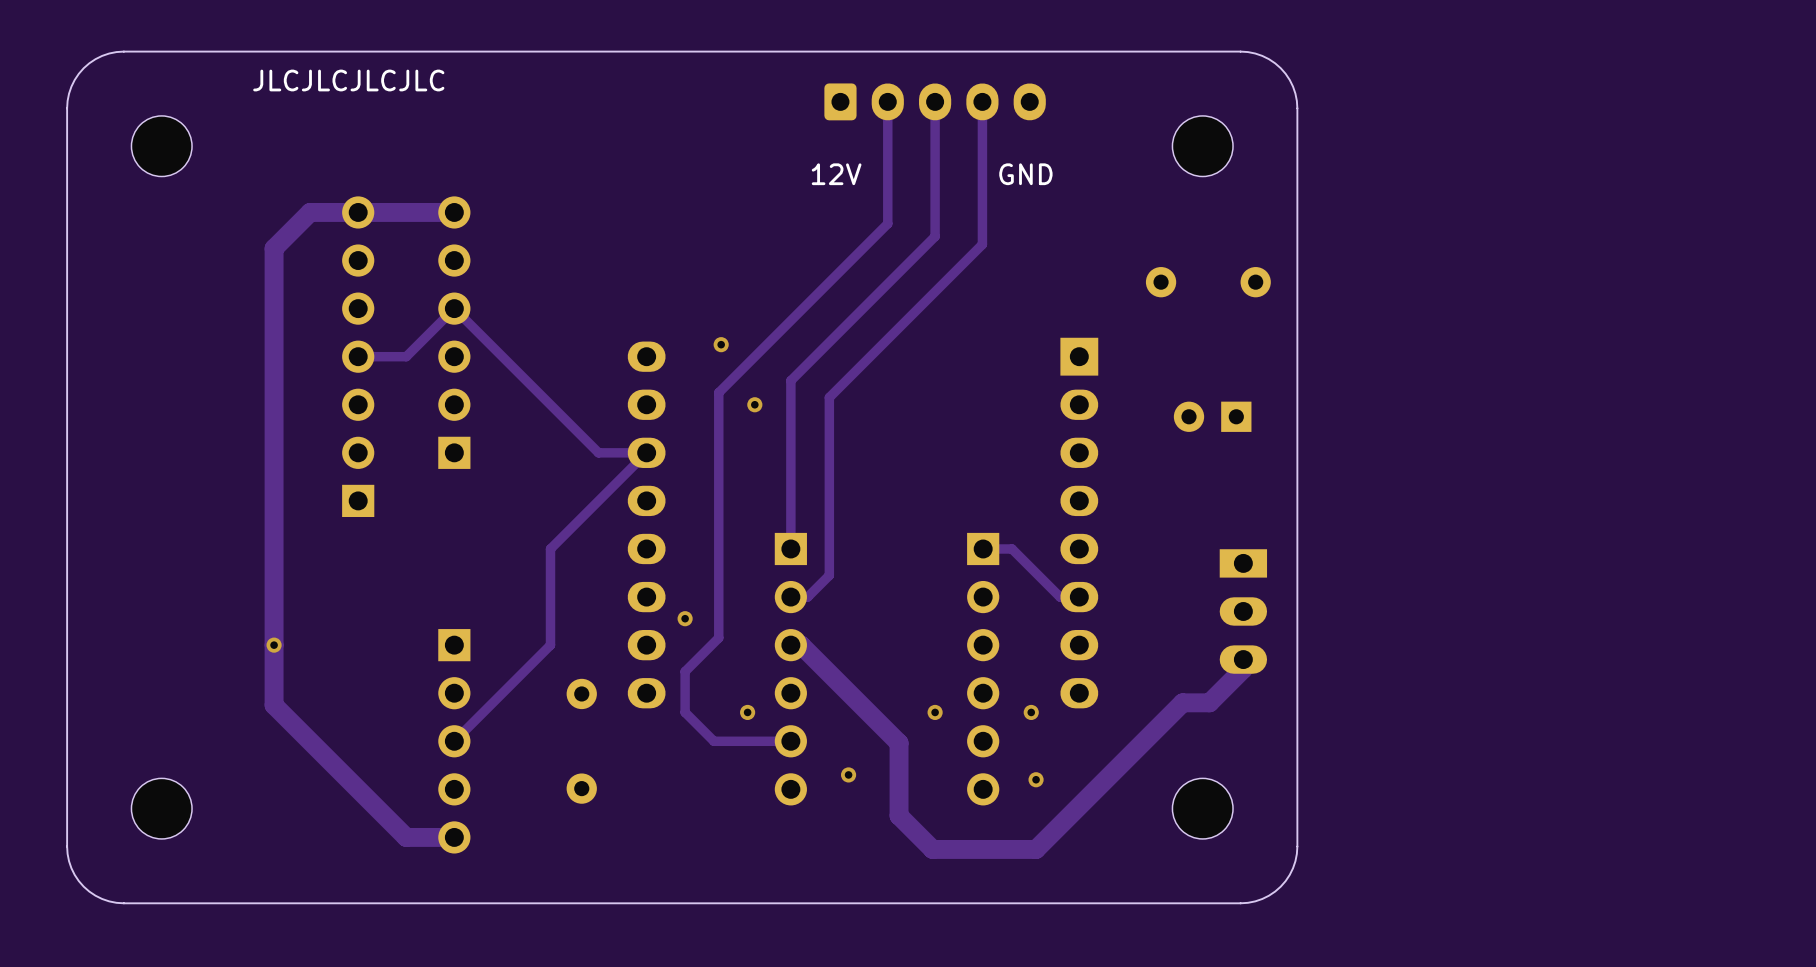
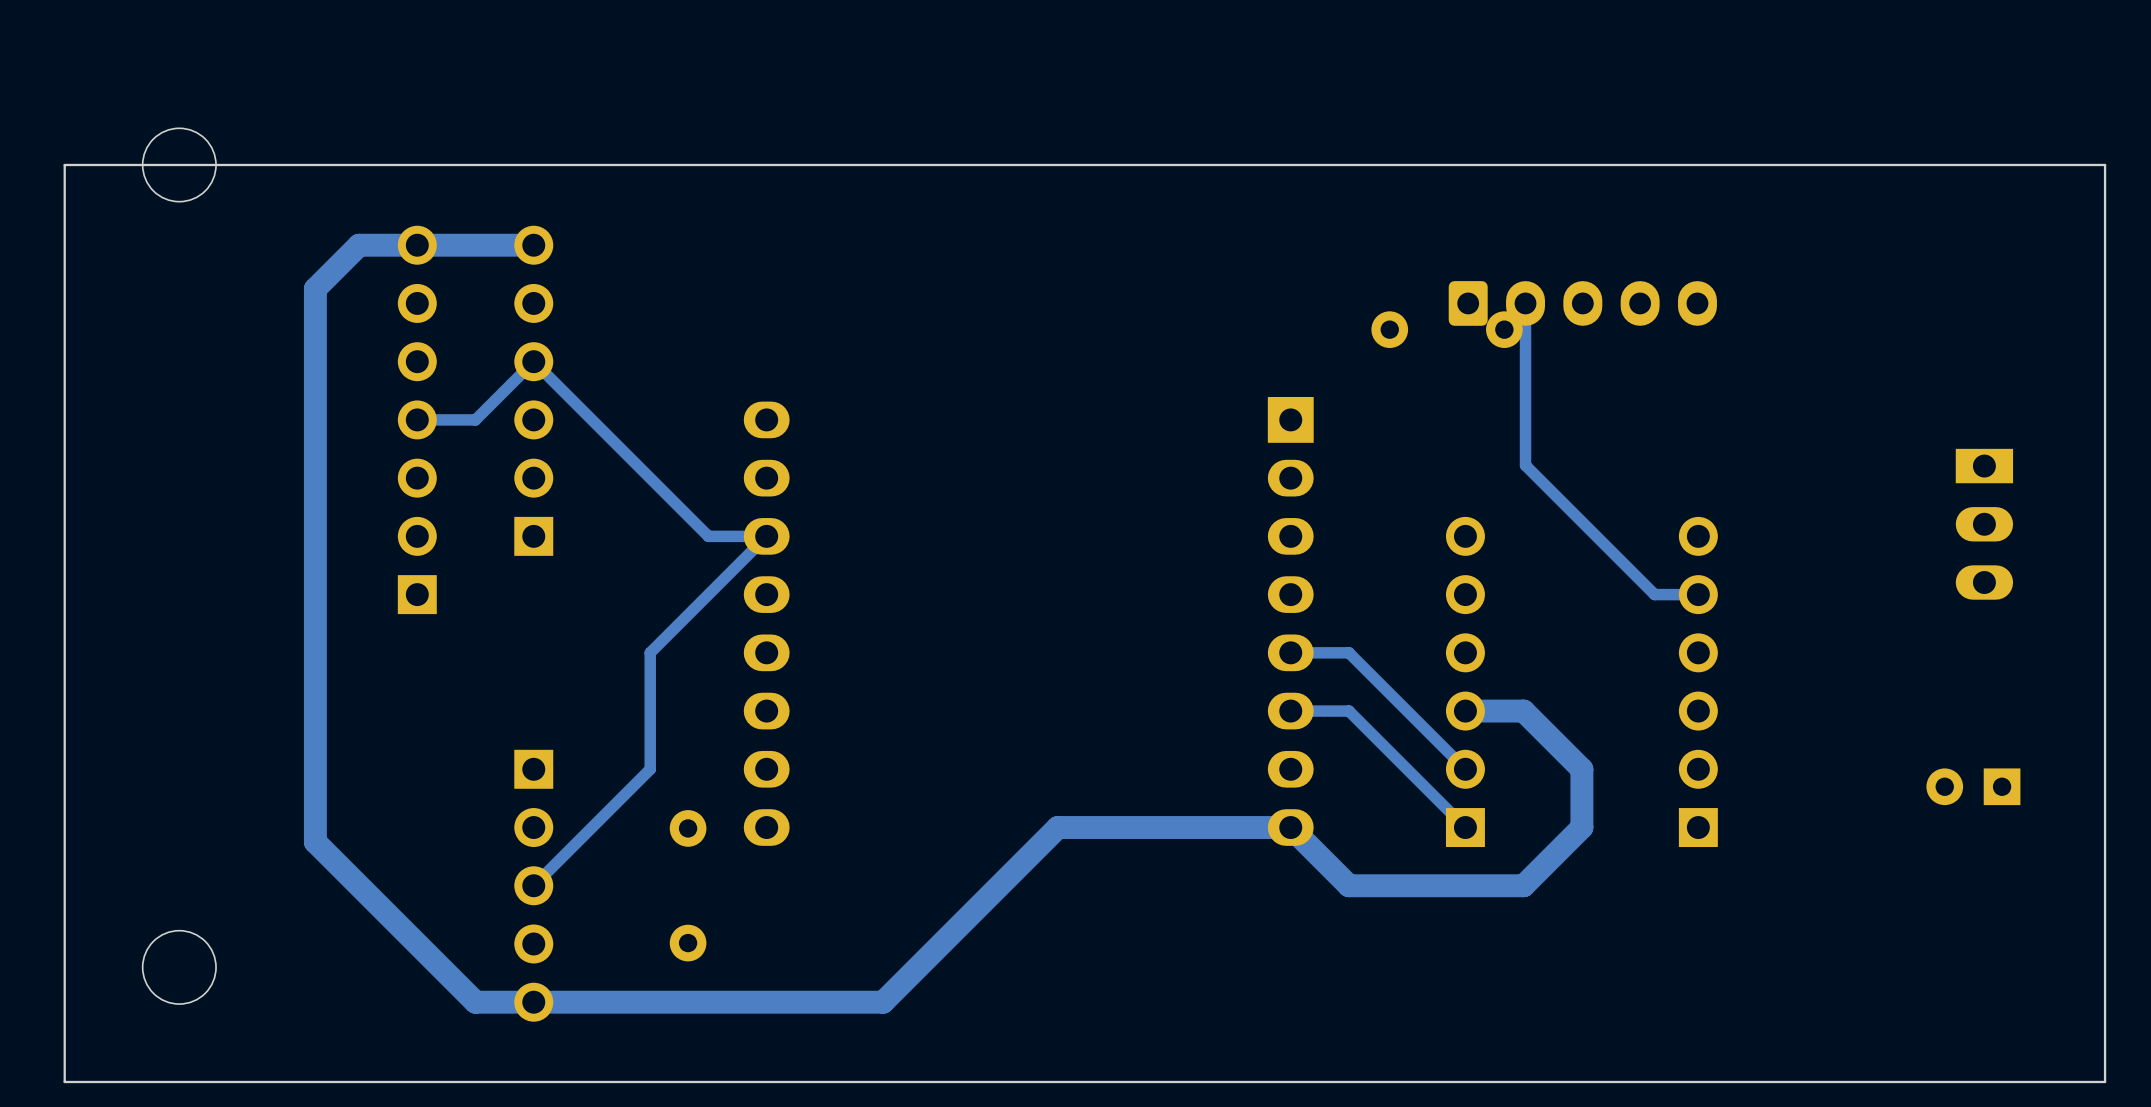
text: JLCJLCJLCJLC (348, 80) -> none
track: (887, 101) (887, 223) (718, 392) (718, 637) (685, 671) (685, 712) (713, 741) (790, 741) -> none
track: (935, 101) (935, 236) (790, 380) (790, 548) -> none
part position: (935, 101) -> (1582, 303)
track: (982, 101) (982, 244) (829, 397) (829, 575) (807, 597) (790, 597) -> none
board edge: (67, 146) (67, 100) (74, 79) (89, 63) (102, 55) (116, 52) (1240, 51) (1255, 53) (1268, 59) (1280, 68) (1289, 79) (1295, 93) (1297, 108) (1297, 846) (1293, 868) (1280, 886) (1262, 898) (1240, 903) -> (64, 164) (2105, 164) (2105, 1081) (1486, 1081)
part: (1202, 146) -> none
text: 12V (836, 174) -> none
text: GND (1025, 174) -> none
track: none -> (1525, 303) (1525, 465) (1654, 594) (1698, 594)
via: (721, 344) -> none
via: (754, 404) -> none
part: (1212, 416) -> none
track: (983, 548) (1012, 548) (1060, 597) (1079, 597) -> (1465, 827) (1348, 711) (1290, 711)
track: none -> (1290, 652) (1348, 652) (1465, 769)
part: none -> (1465, 681)
part: none -> (1698, 681)
track: none -> (1465, 711) (1523, 711) (1581, 769) (1581, 827) (1523, 885) (1348, 885) (1290, 827) (1057, 827) (883, 1002) (533, 1002)
part position: (1243, 611) -> (1984, 524)
via: (685, 618) -> none
via: (274, 645) -> none
track: (790, 645) (801, 645) (899, 743) (899, 815) (932, 849) (1036, 849) (1182, 702) (1209, 702) (1243, 669) (1243, 659) -> none
part: none -> (1973, 786)
part: (790, 669) -> none
part: (983, 669) -> none
via: (747, 712) -> none
via: (935, 712) -> none
via: (1031, 712) -> none
via: (848, 774) -> none
via: (1036, 779) -> none
part: (1202, 808) -> none
board edge: (67, 846) (71, 868) (83, 886) (102, 898) (123, 903) -> (64, 1013) (64, 1081) (133, 1081)

